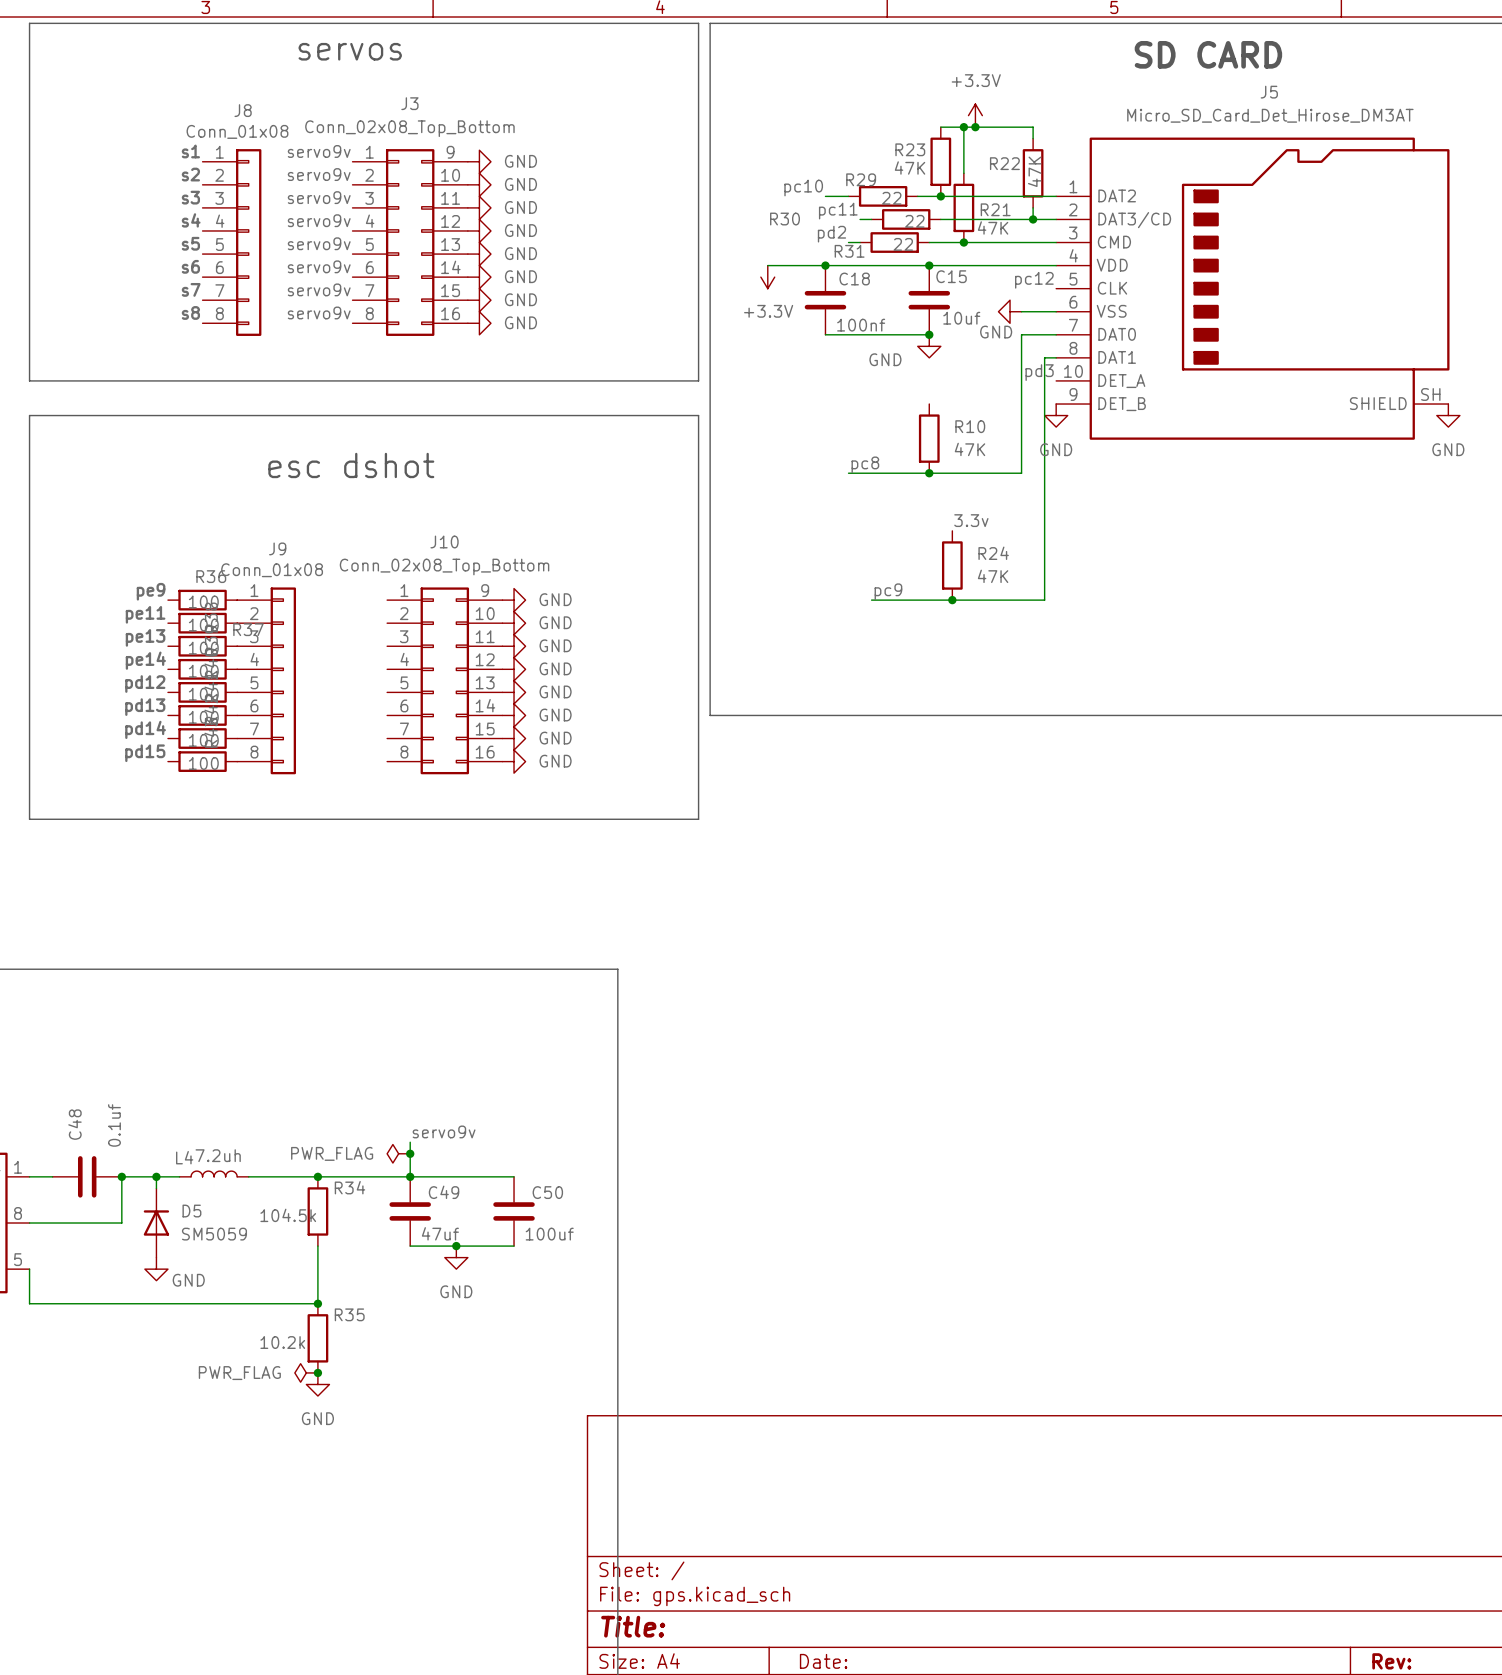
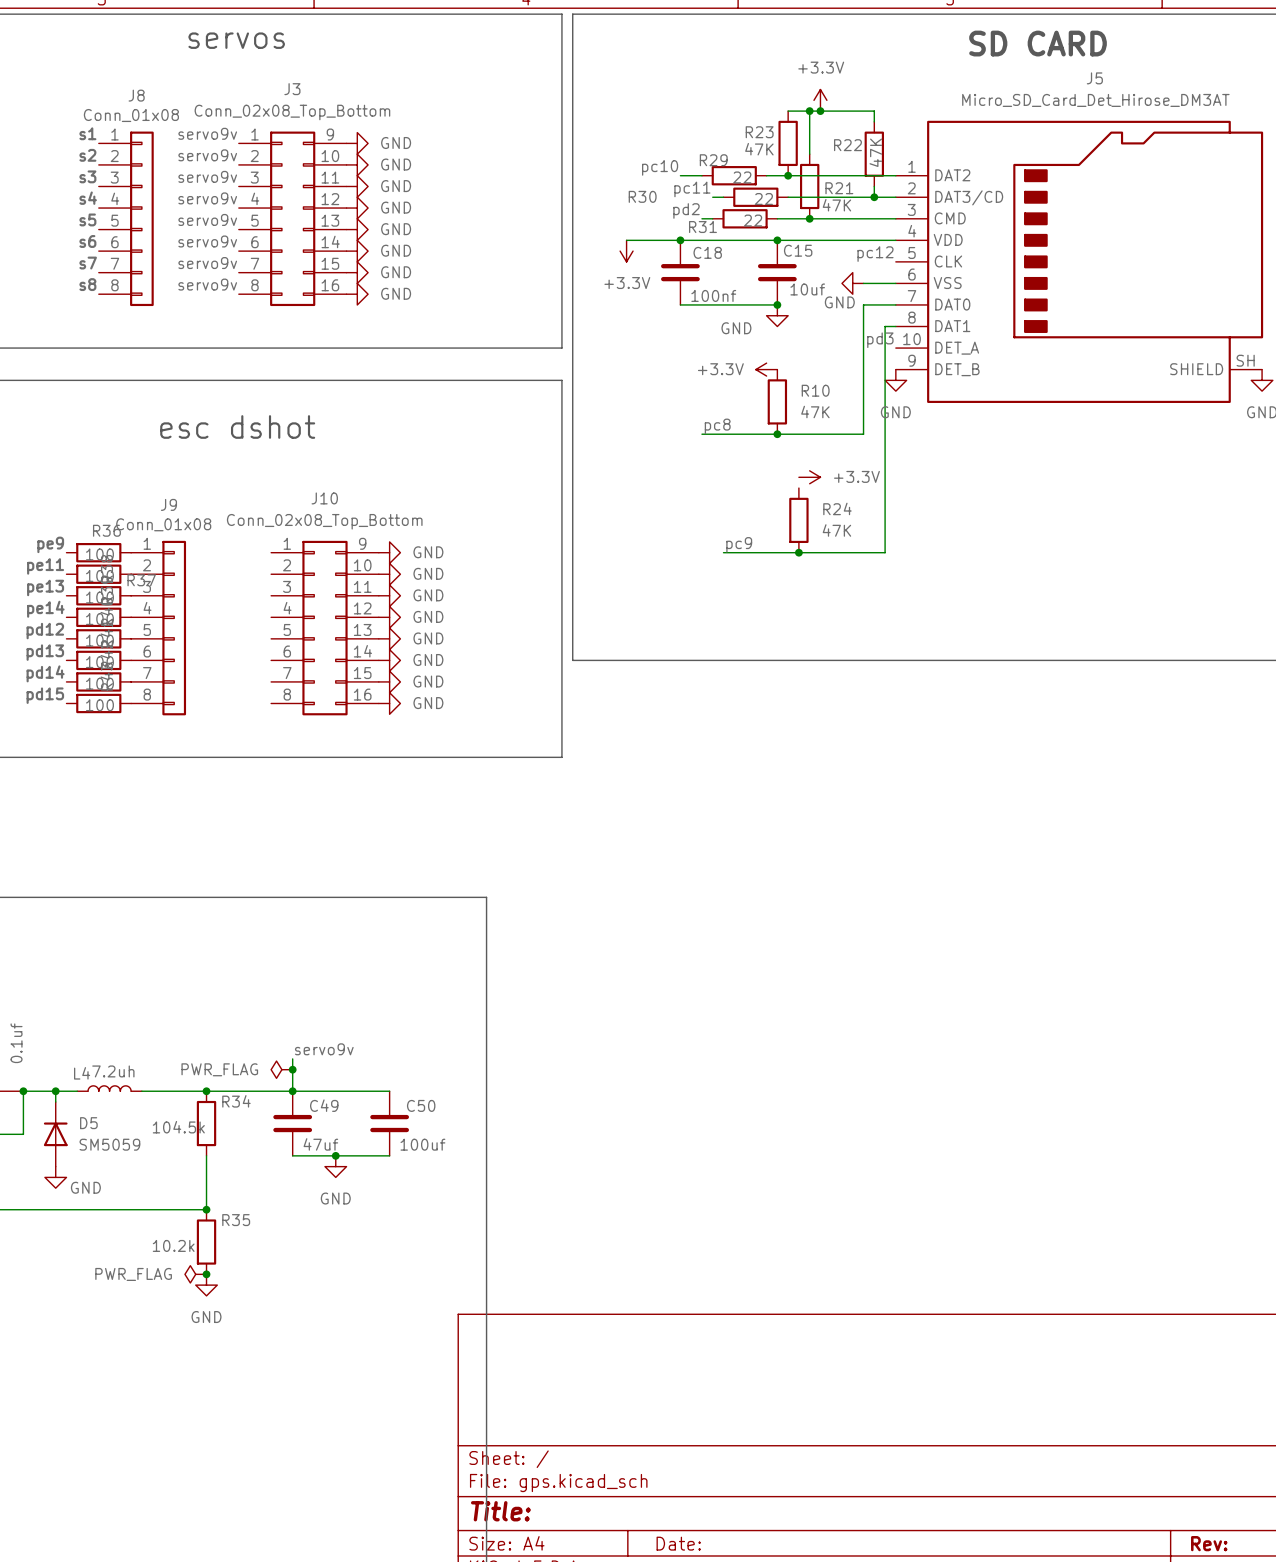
power symbol: none -> +3.3V (766, 369)
power symbol: none -> +3.3V (809, 477)
label: 3.3v (971, 520) -> none

